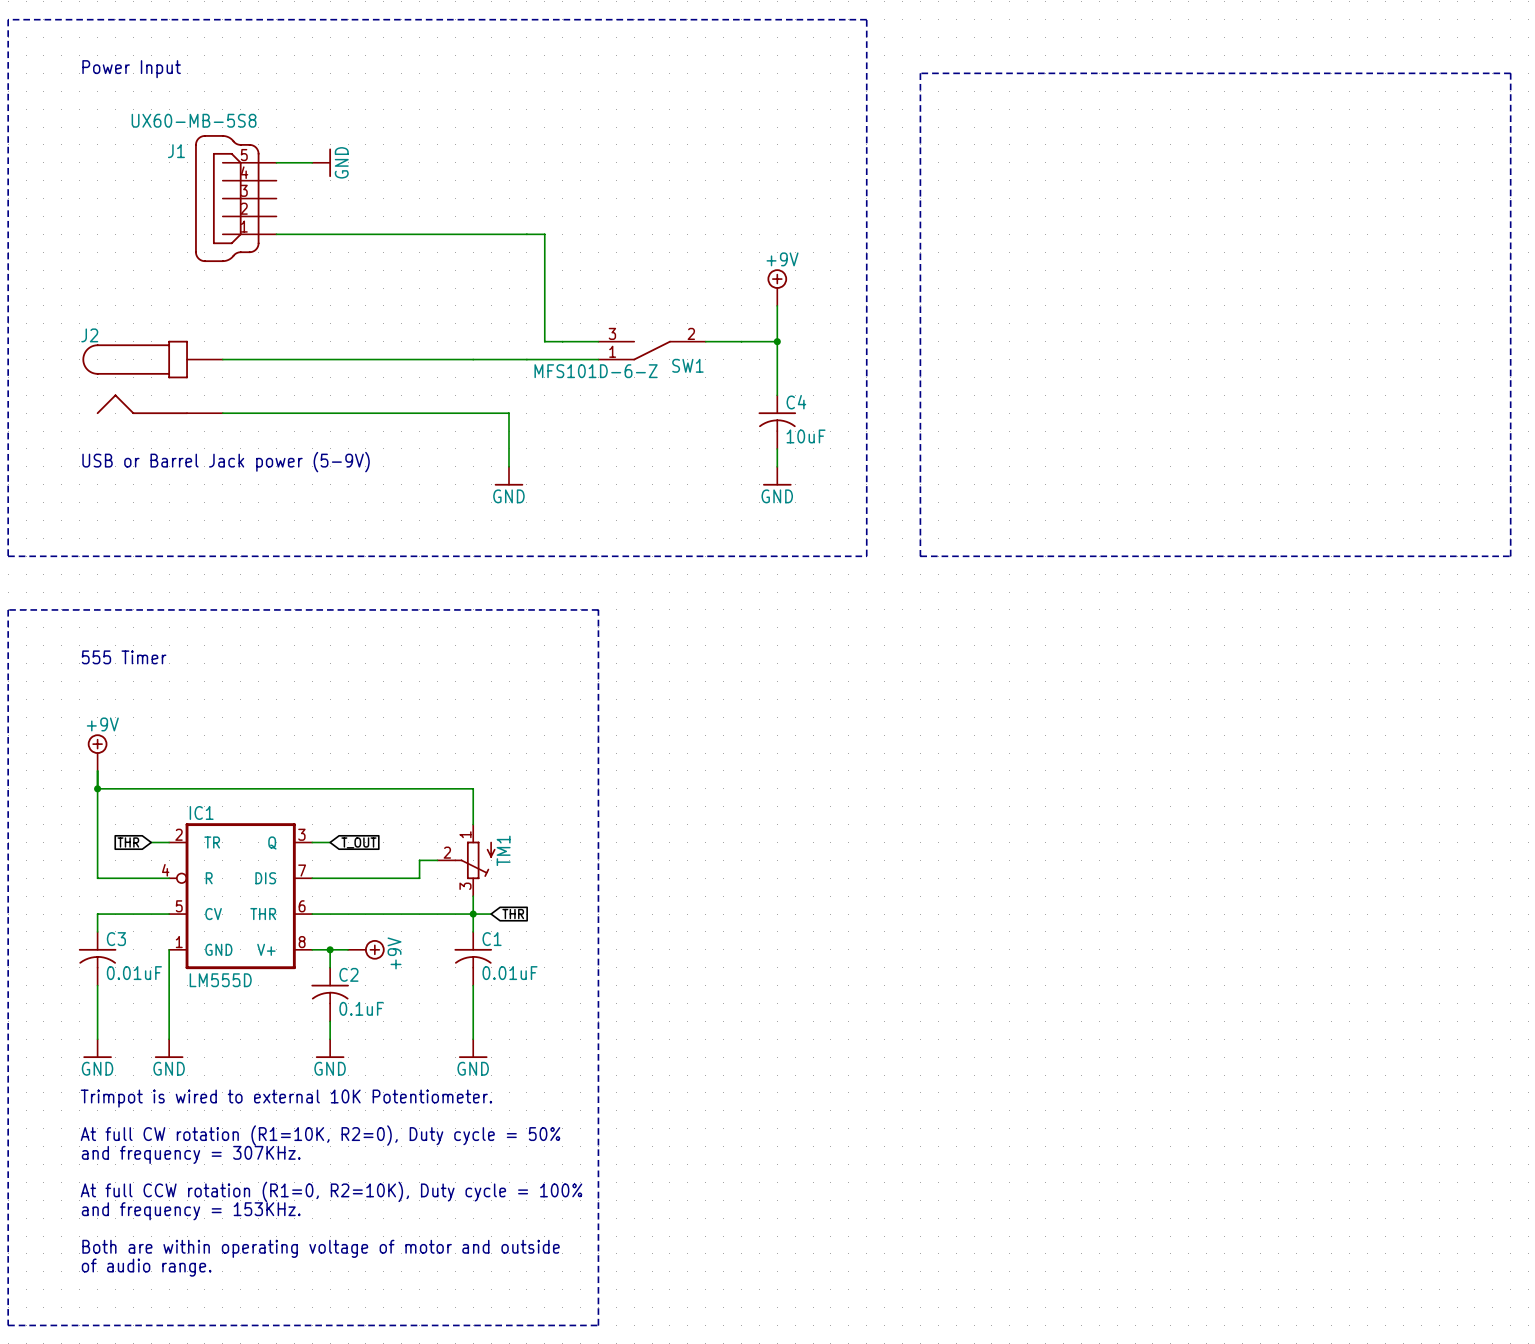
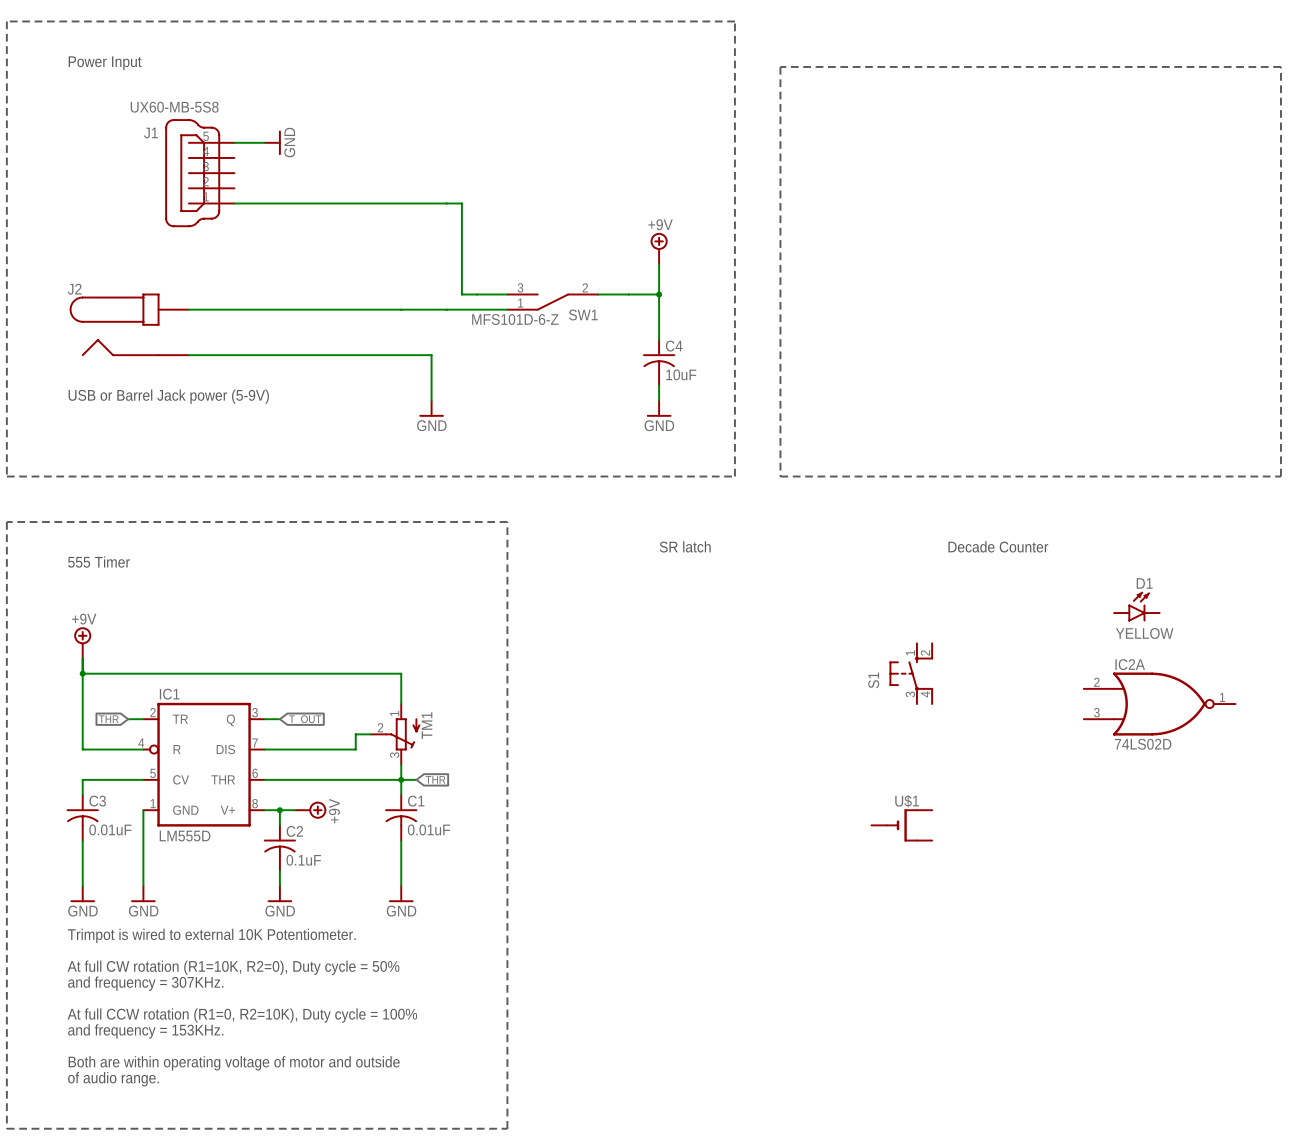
text: none -> SR latch (685, 546)
text: none -> Decade Counter (998, 546)
D1: none -> YELLOW (1136, 606)
S1: none -> (911, 673)
IC2A: none -> 74LS02D (1159, 704)
U$1: none -> (901, 825)

